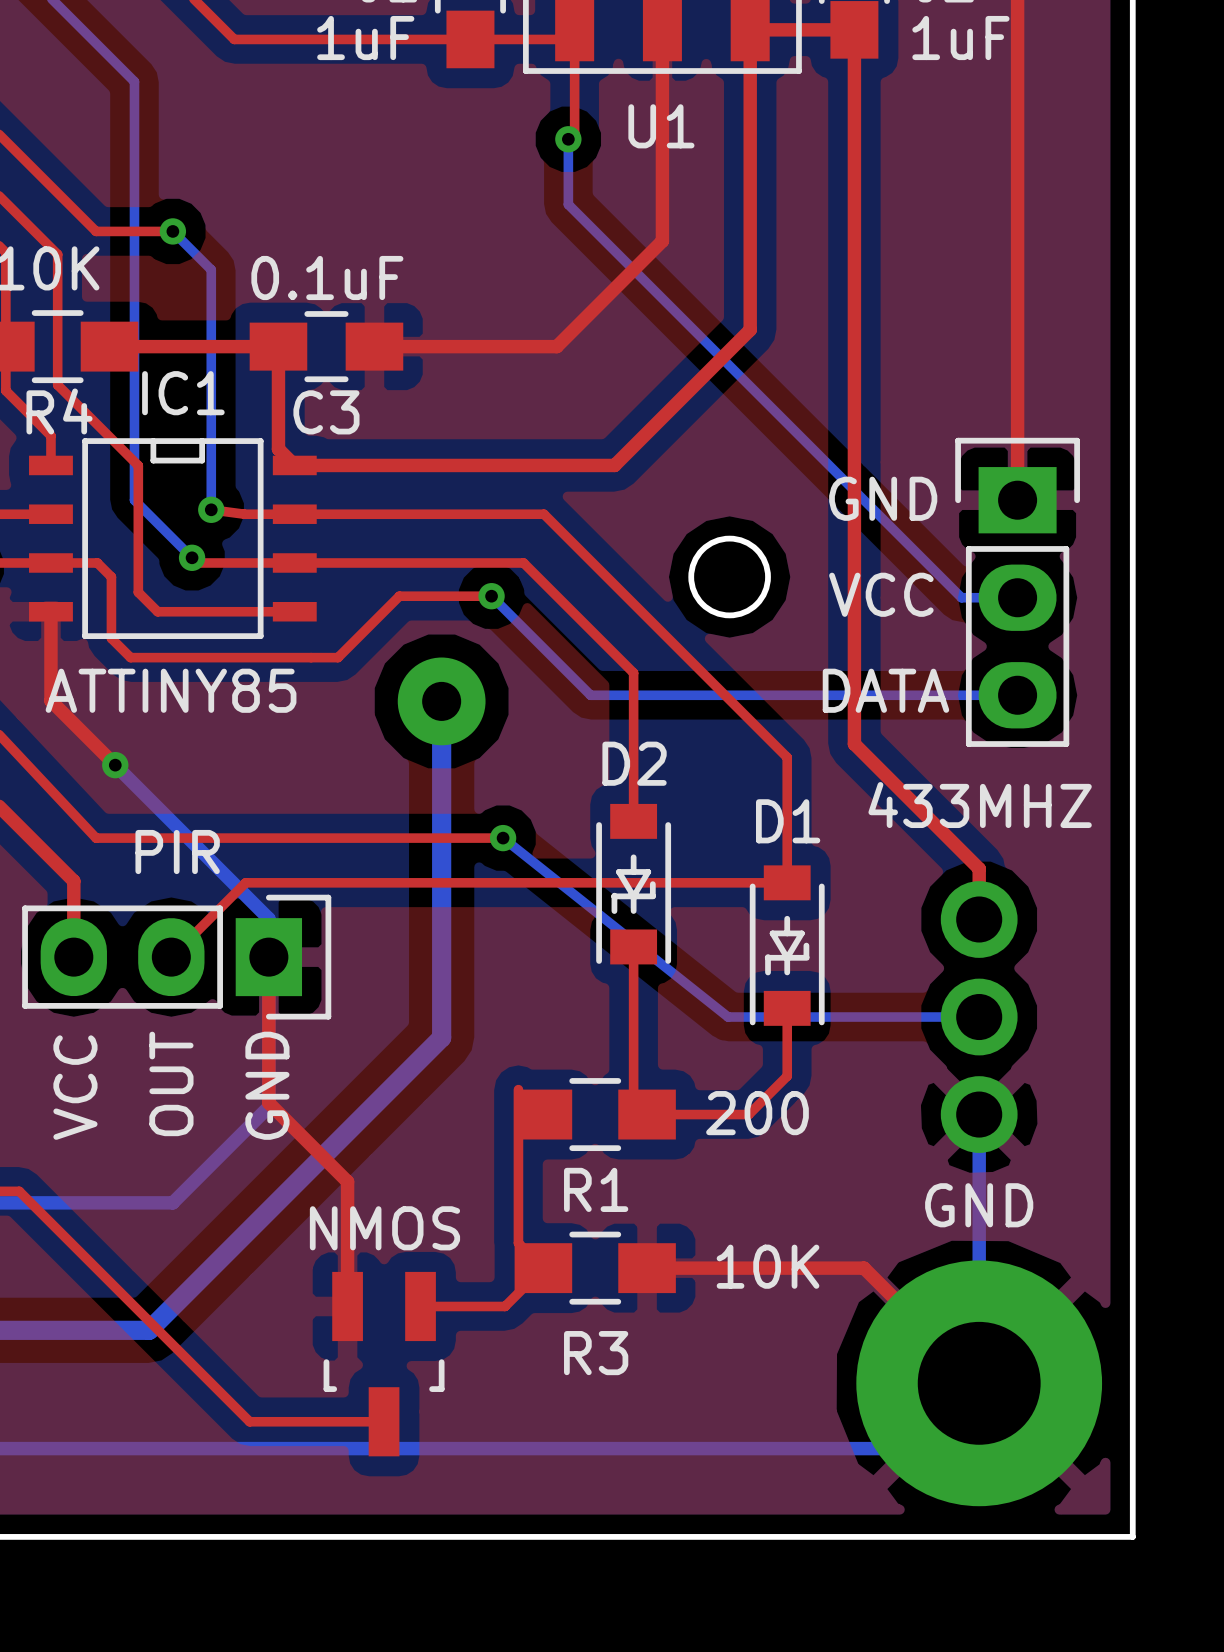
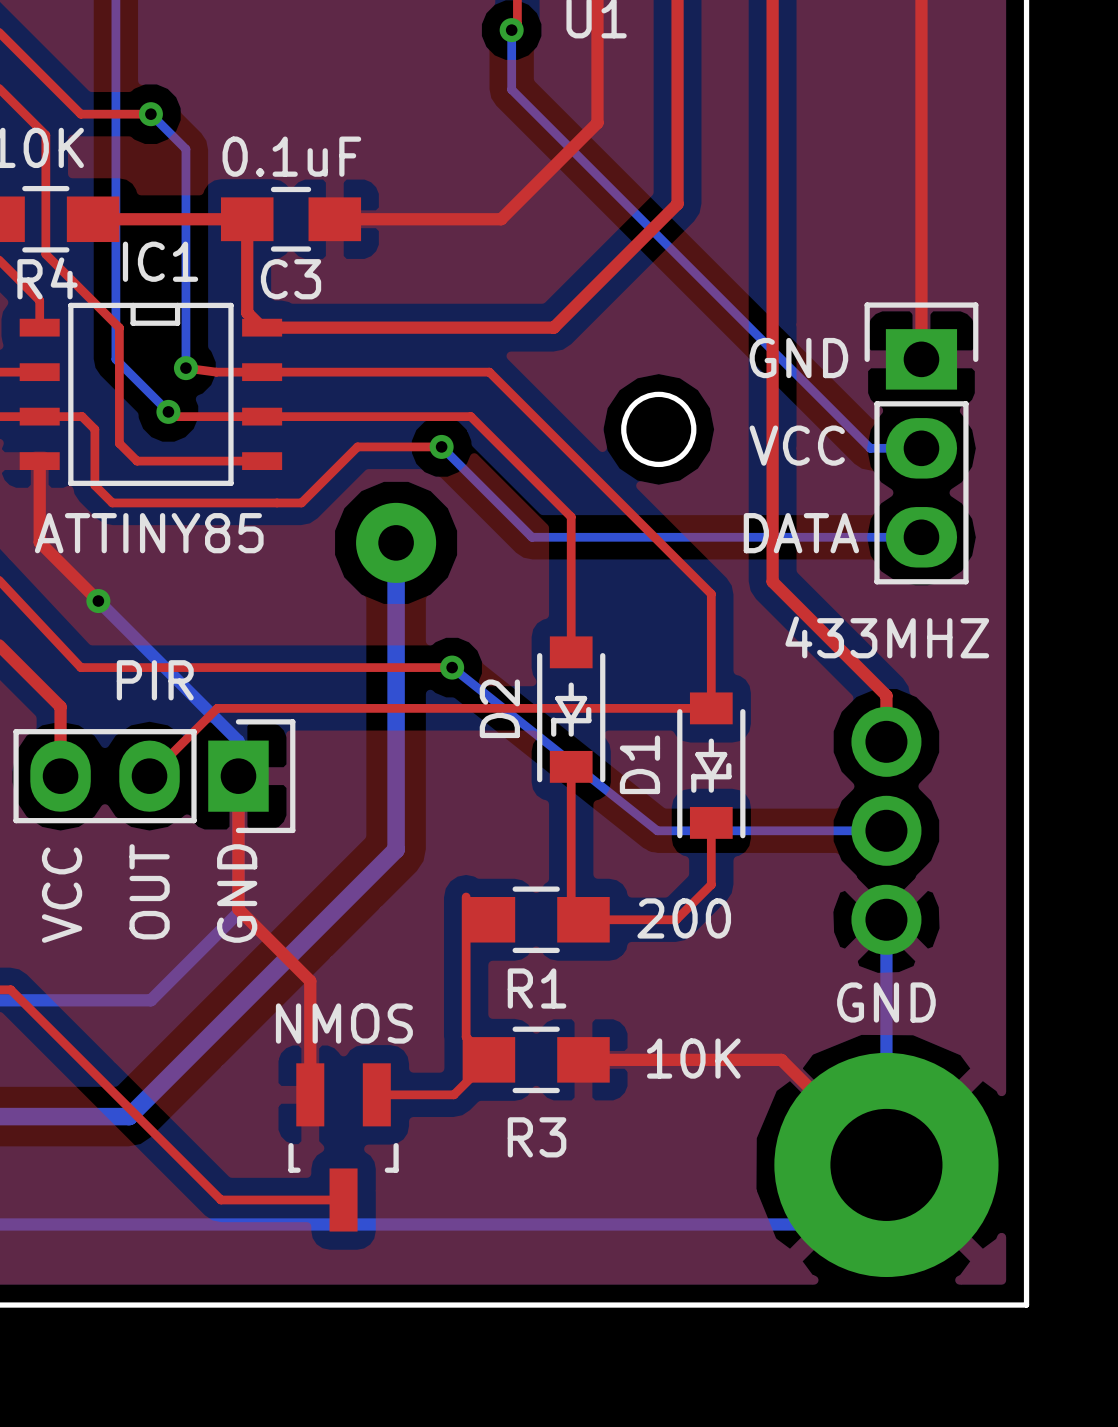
D2 name rotation: 0° (634, 763) -> 90° counterclockwise (499, 708)
D2 name position: D2 (634, 763) -> D2 (499, 708)
D1 name rotation: 0° (788, 821) -> 90° counterclockwise (639, 764)
D1 name position: D1 (788, 821) -> D1 (639, 764)

